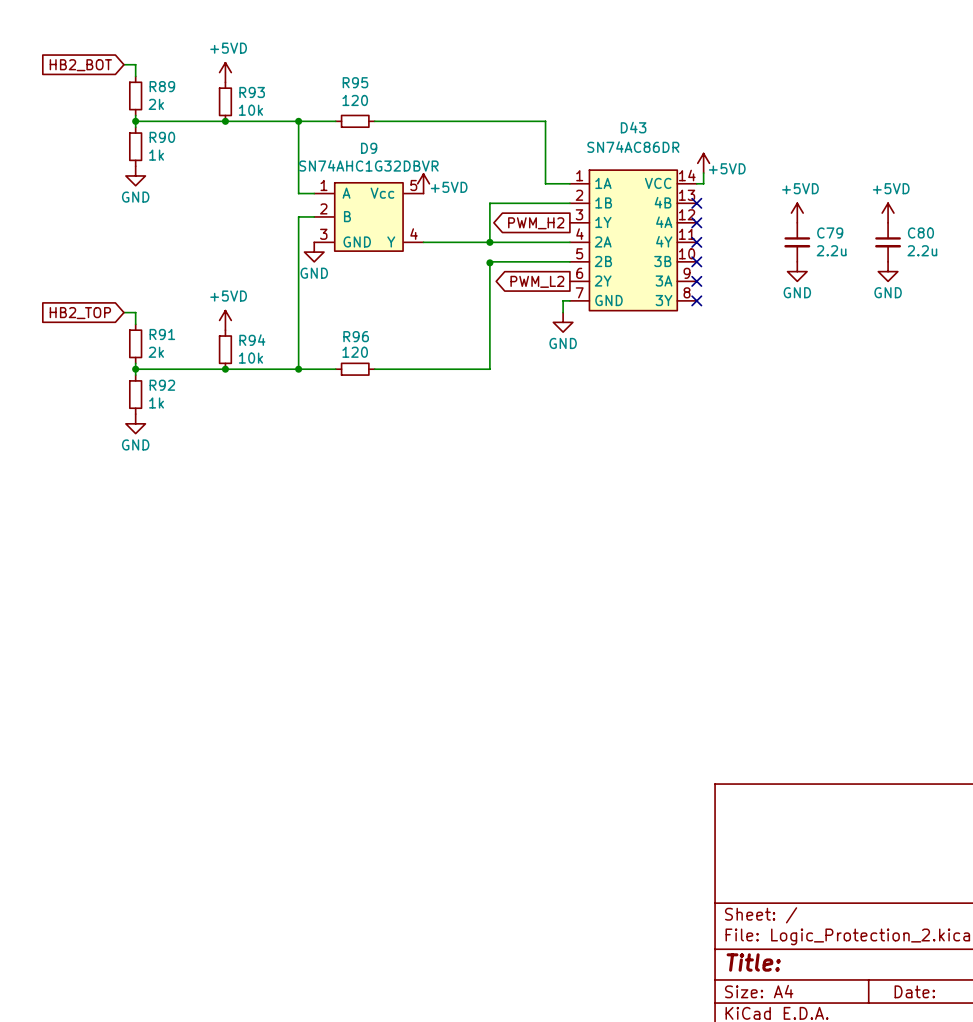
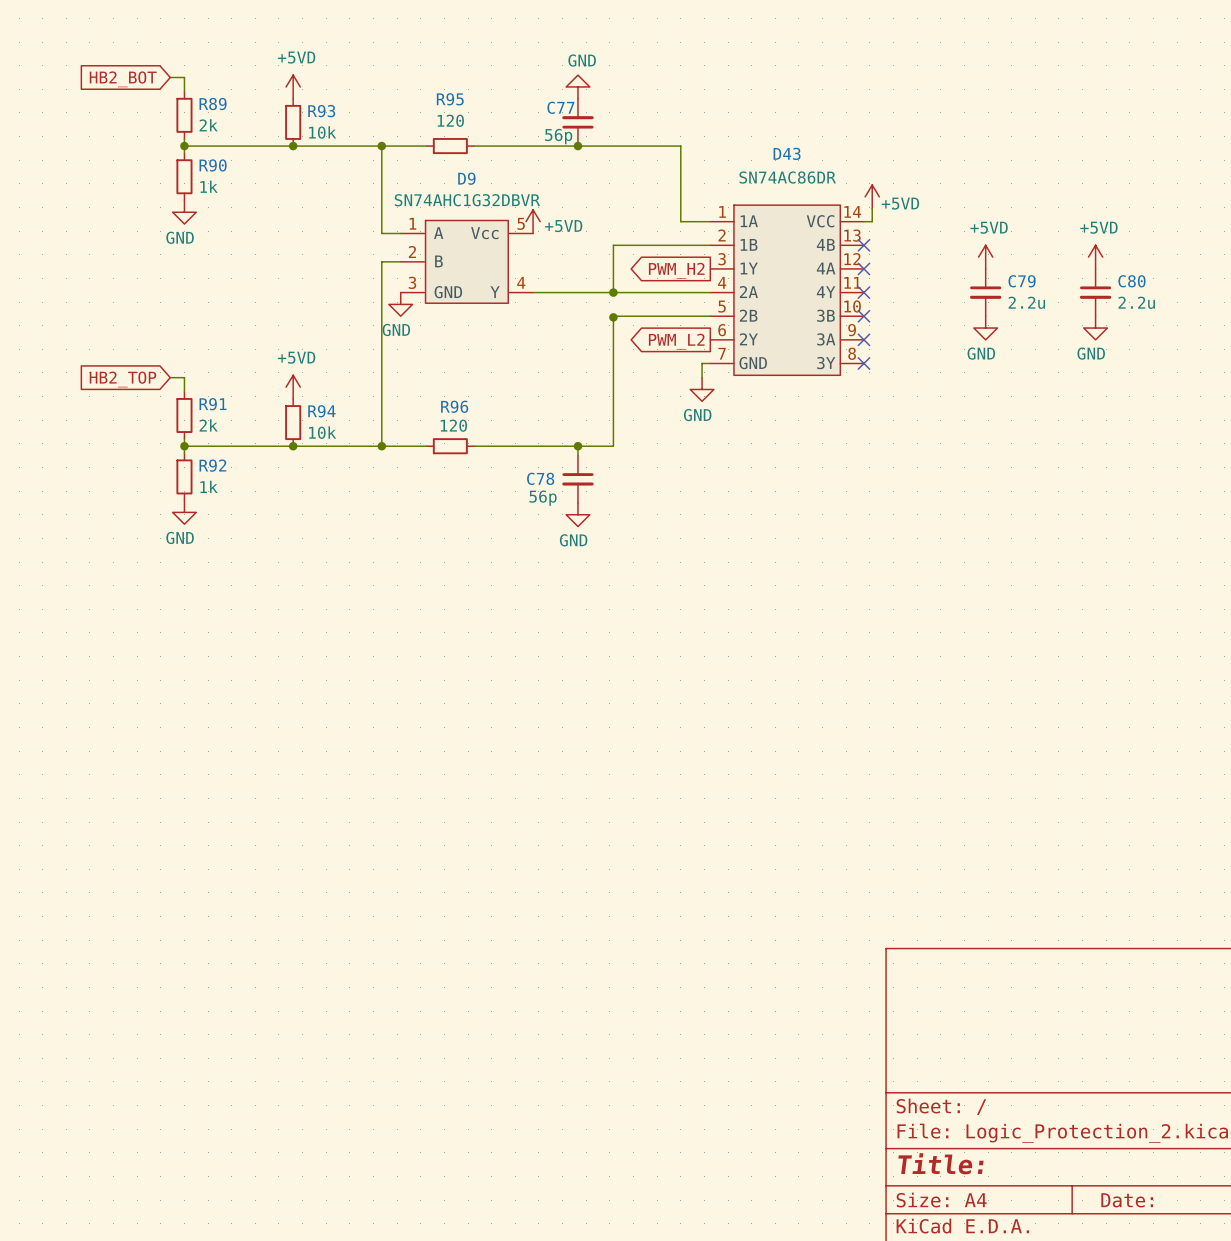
power symbol: none -> GND (577, 86)
C77: none -> 56p (577, 122)
junction: none -> (577, 146)
wire: none -> (577, 446) (577, 455)
junction: none -> (577, 446)
C78: none -> 56p (577, 479)
power symbol: none -> GND (577, 514)

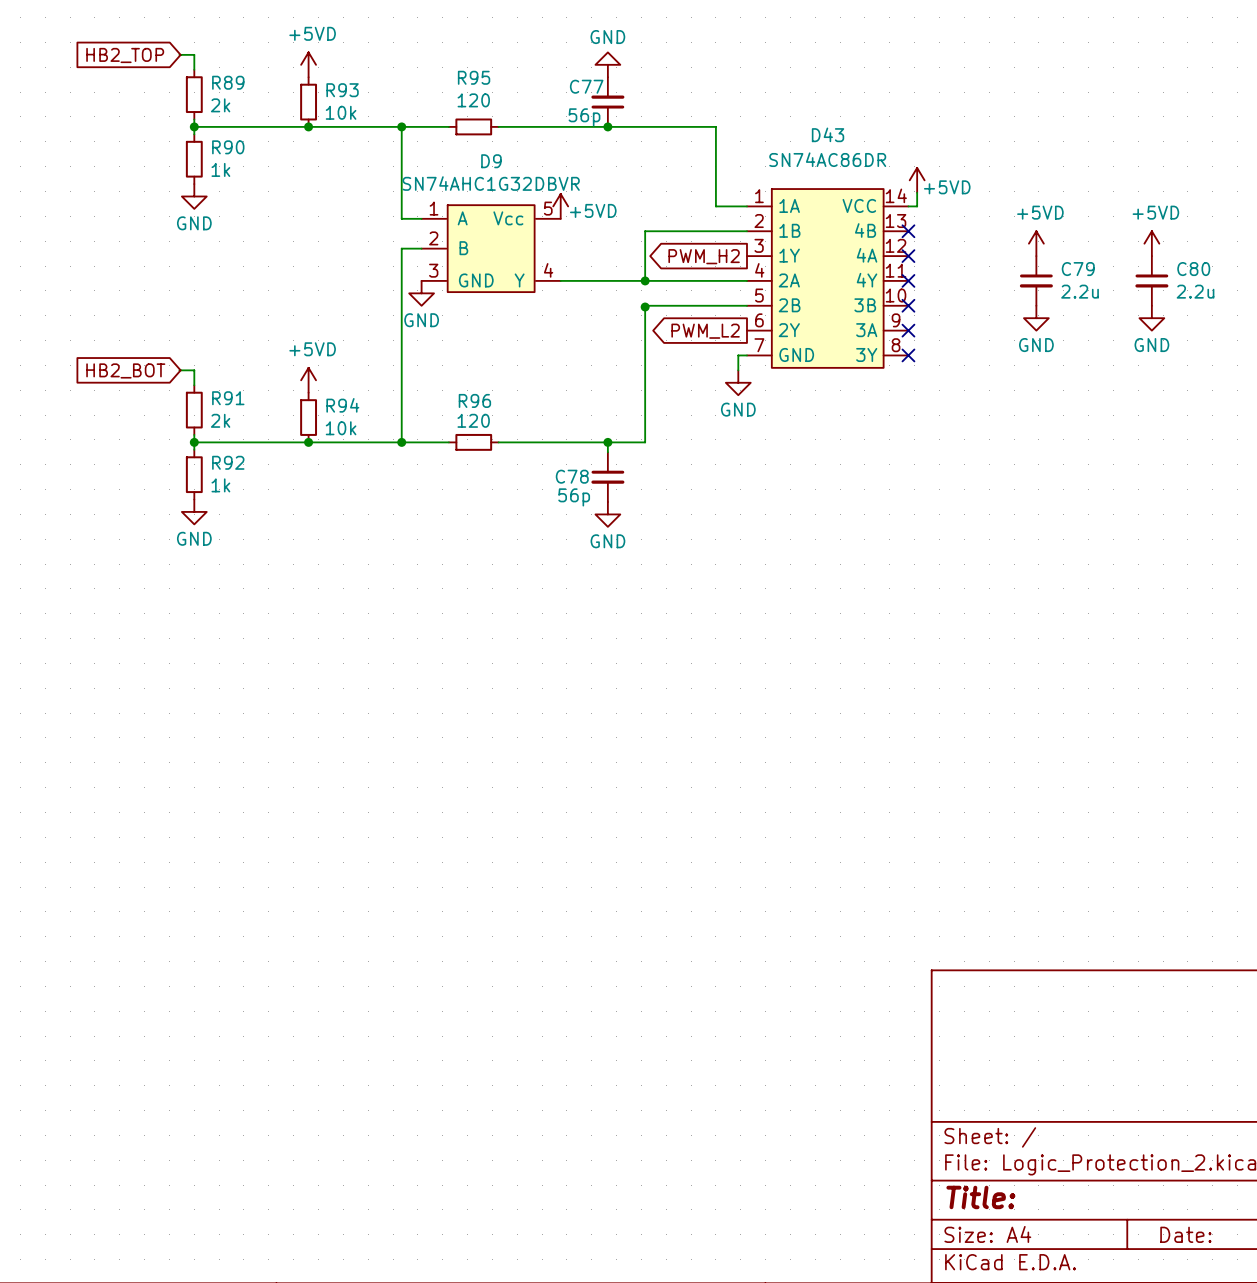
global label: HB2_BOT (123, 79) -> HB2_TOP (125, 55)
global label: HB2_TOP (123, 379) -> HB2_BOT (125, 370)

